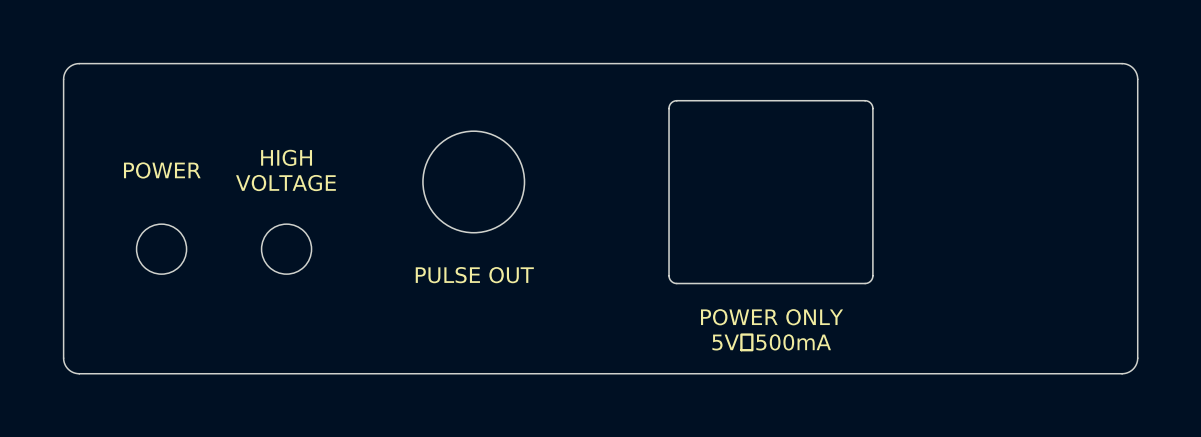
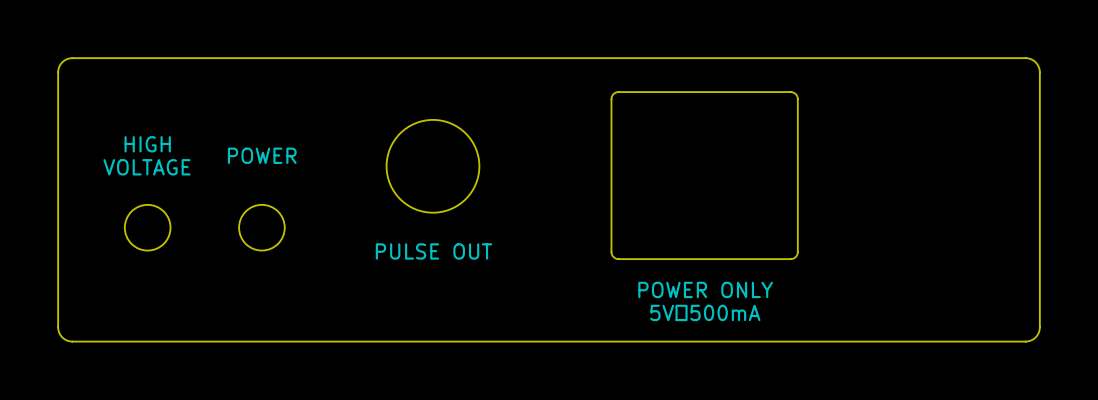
text position: HIGH (286, 157) -> HIGH (147, 144)
text position: POWER (162, 170) -> POWER (262, 155)
text position: VOLTAGE (285, 183) -> VOLTAGE (146, 167)

